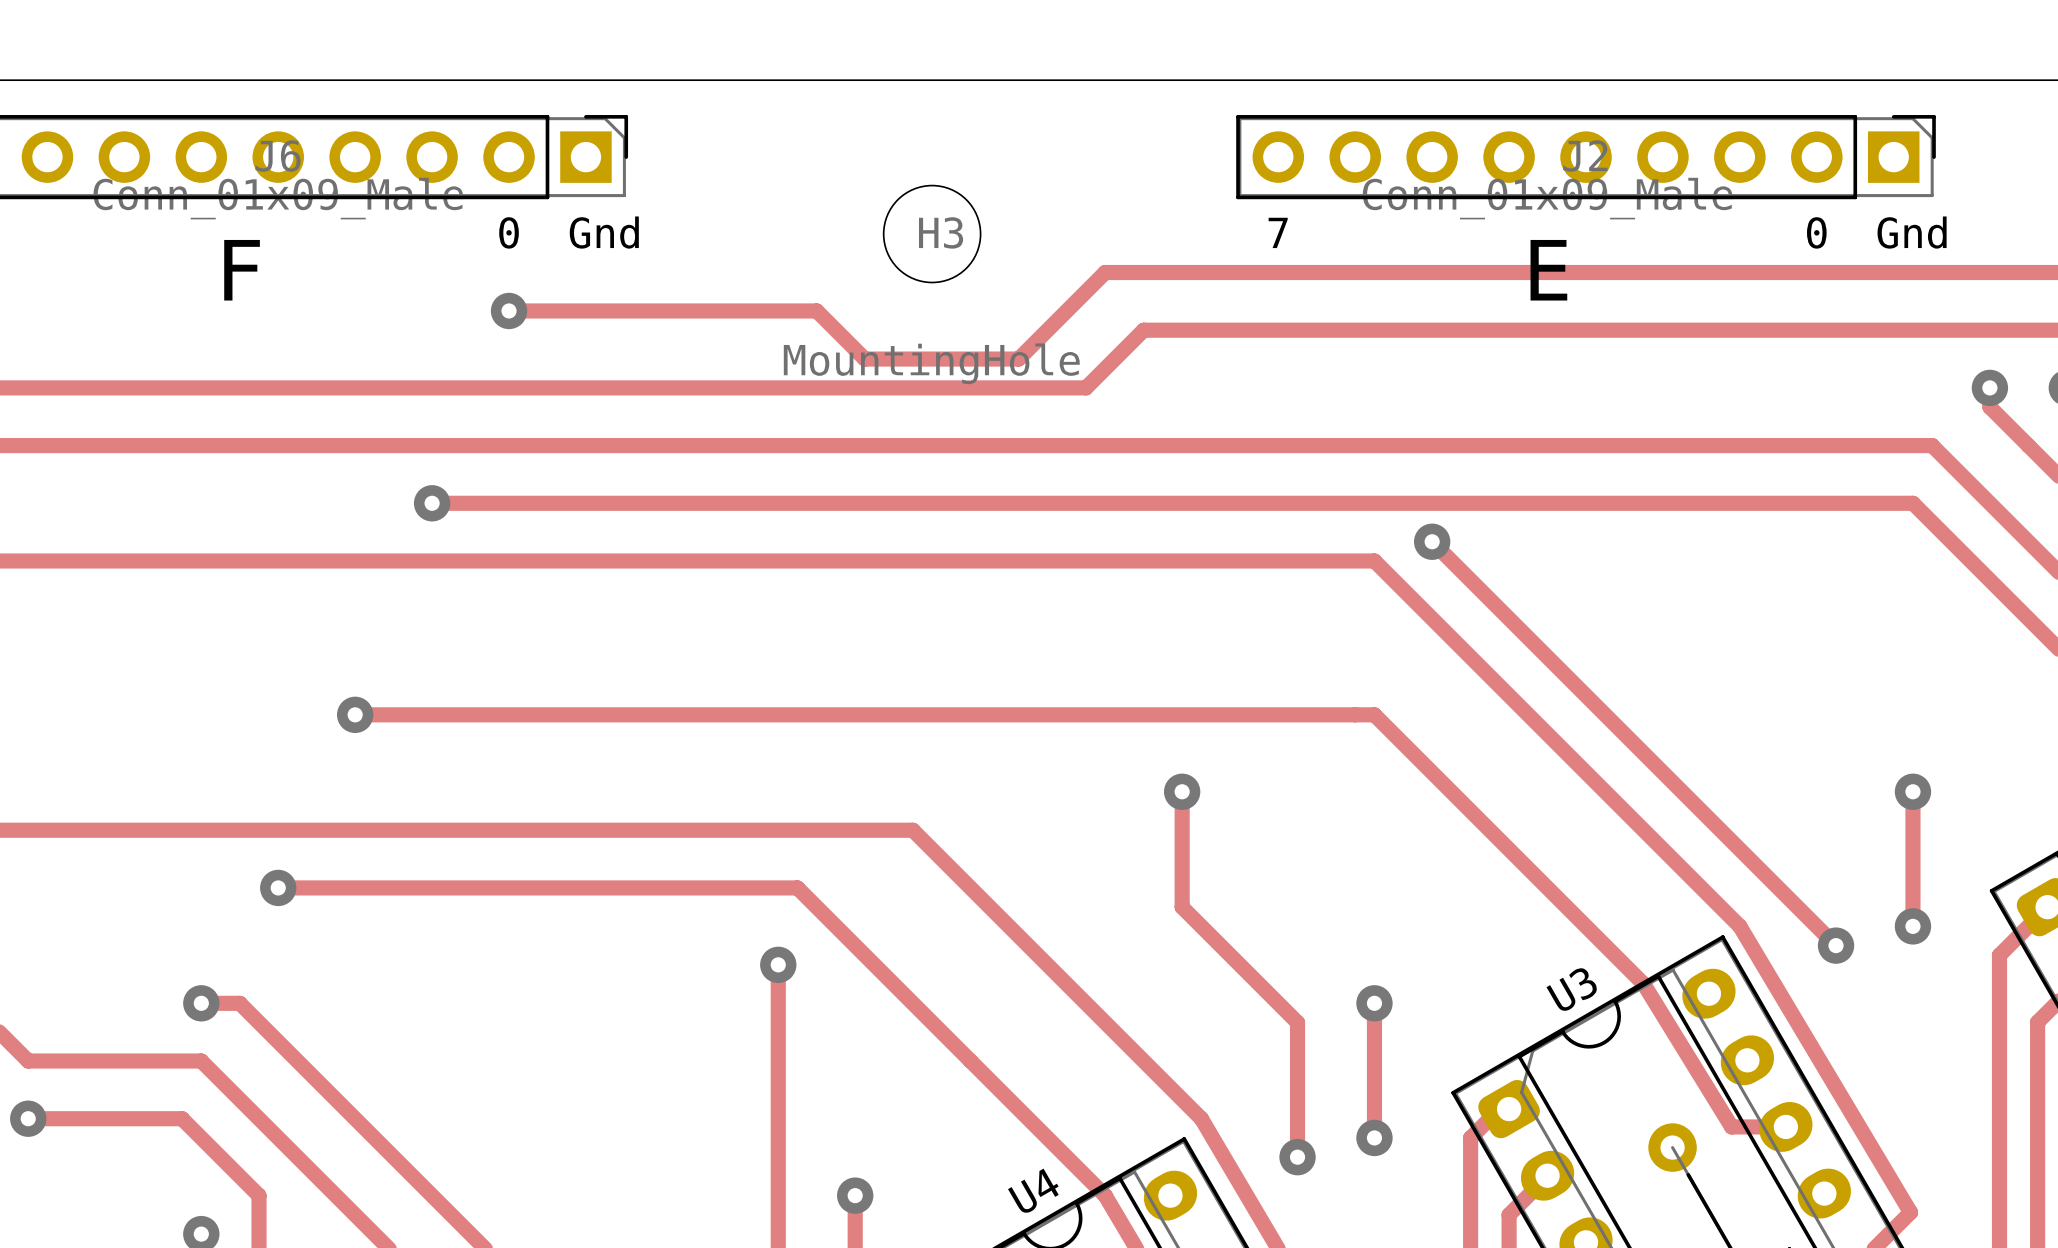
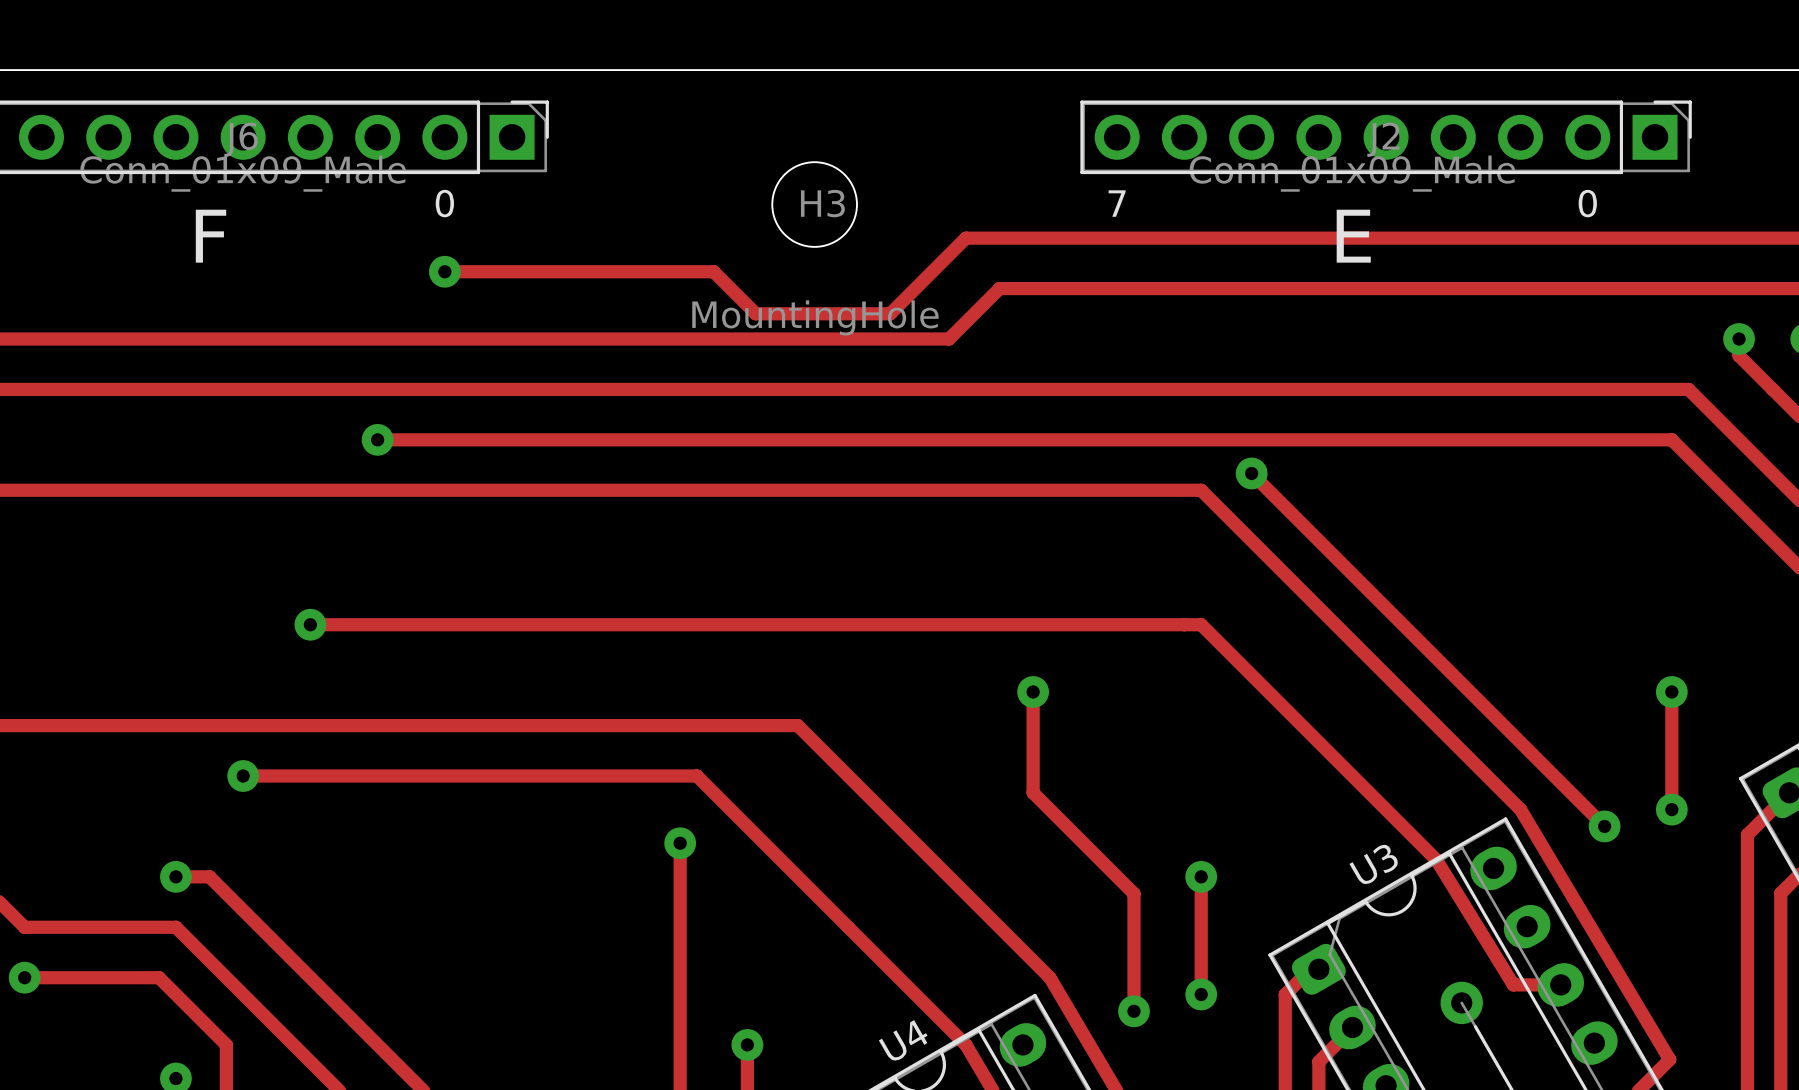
text: Gnd (604, 232) -> none
text: Gnd (1912, 232) -> none

